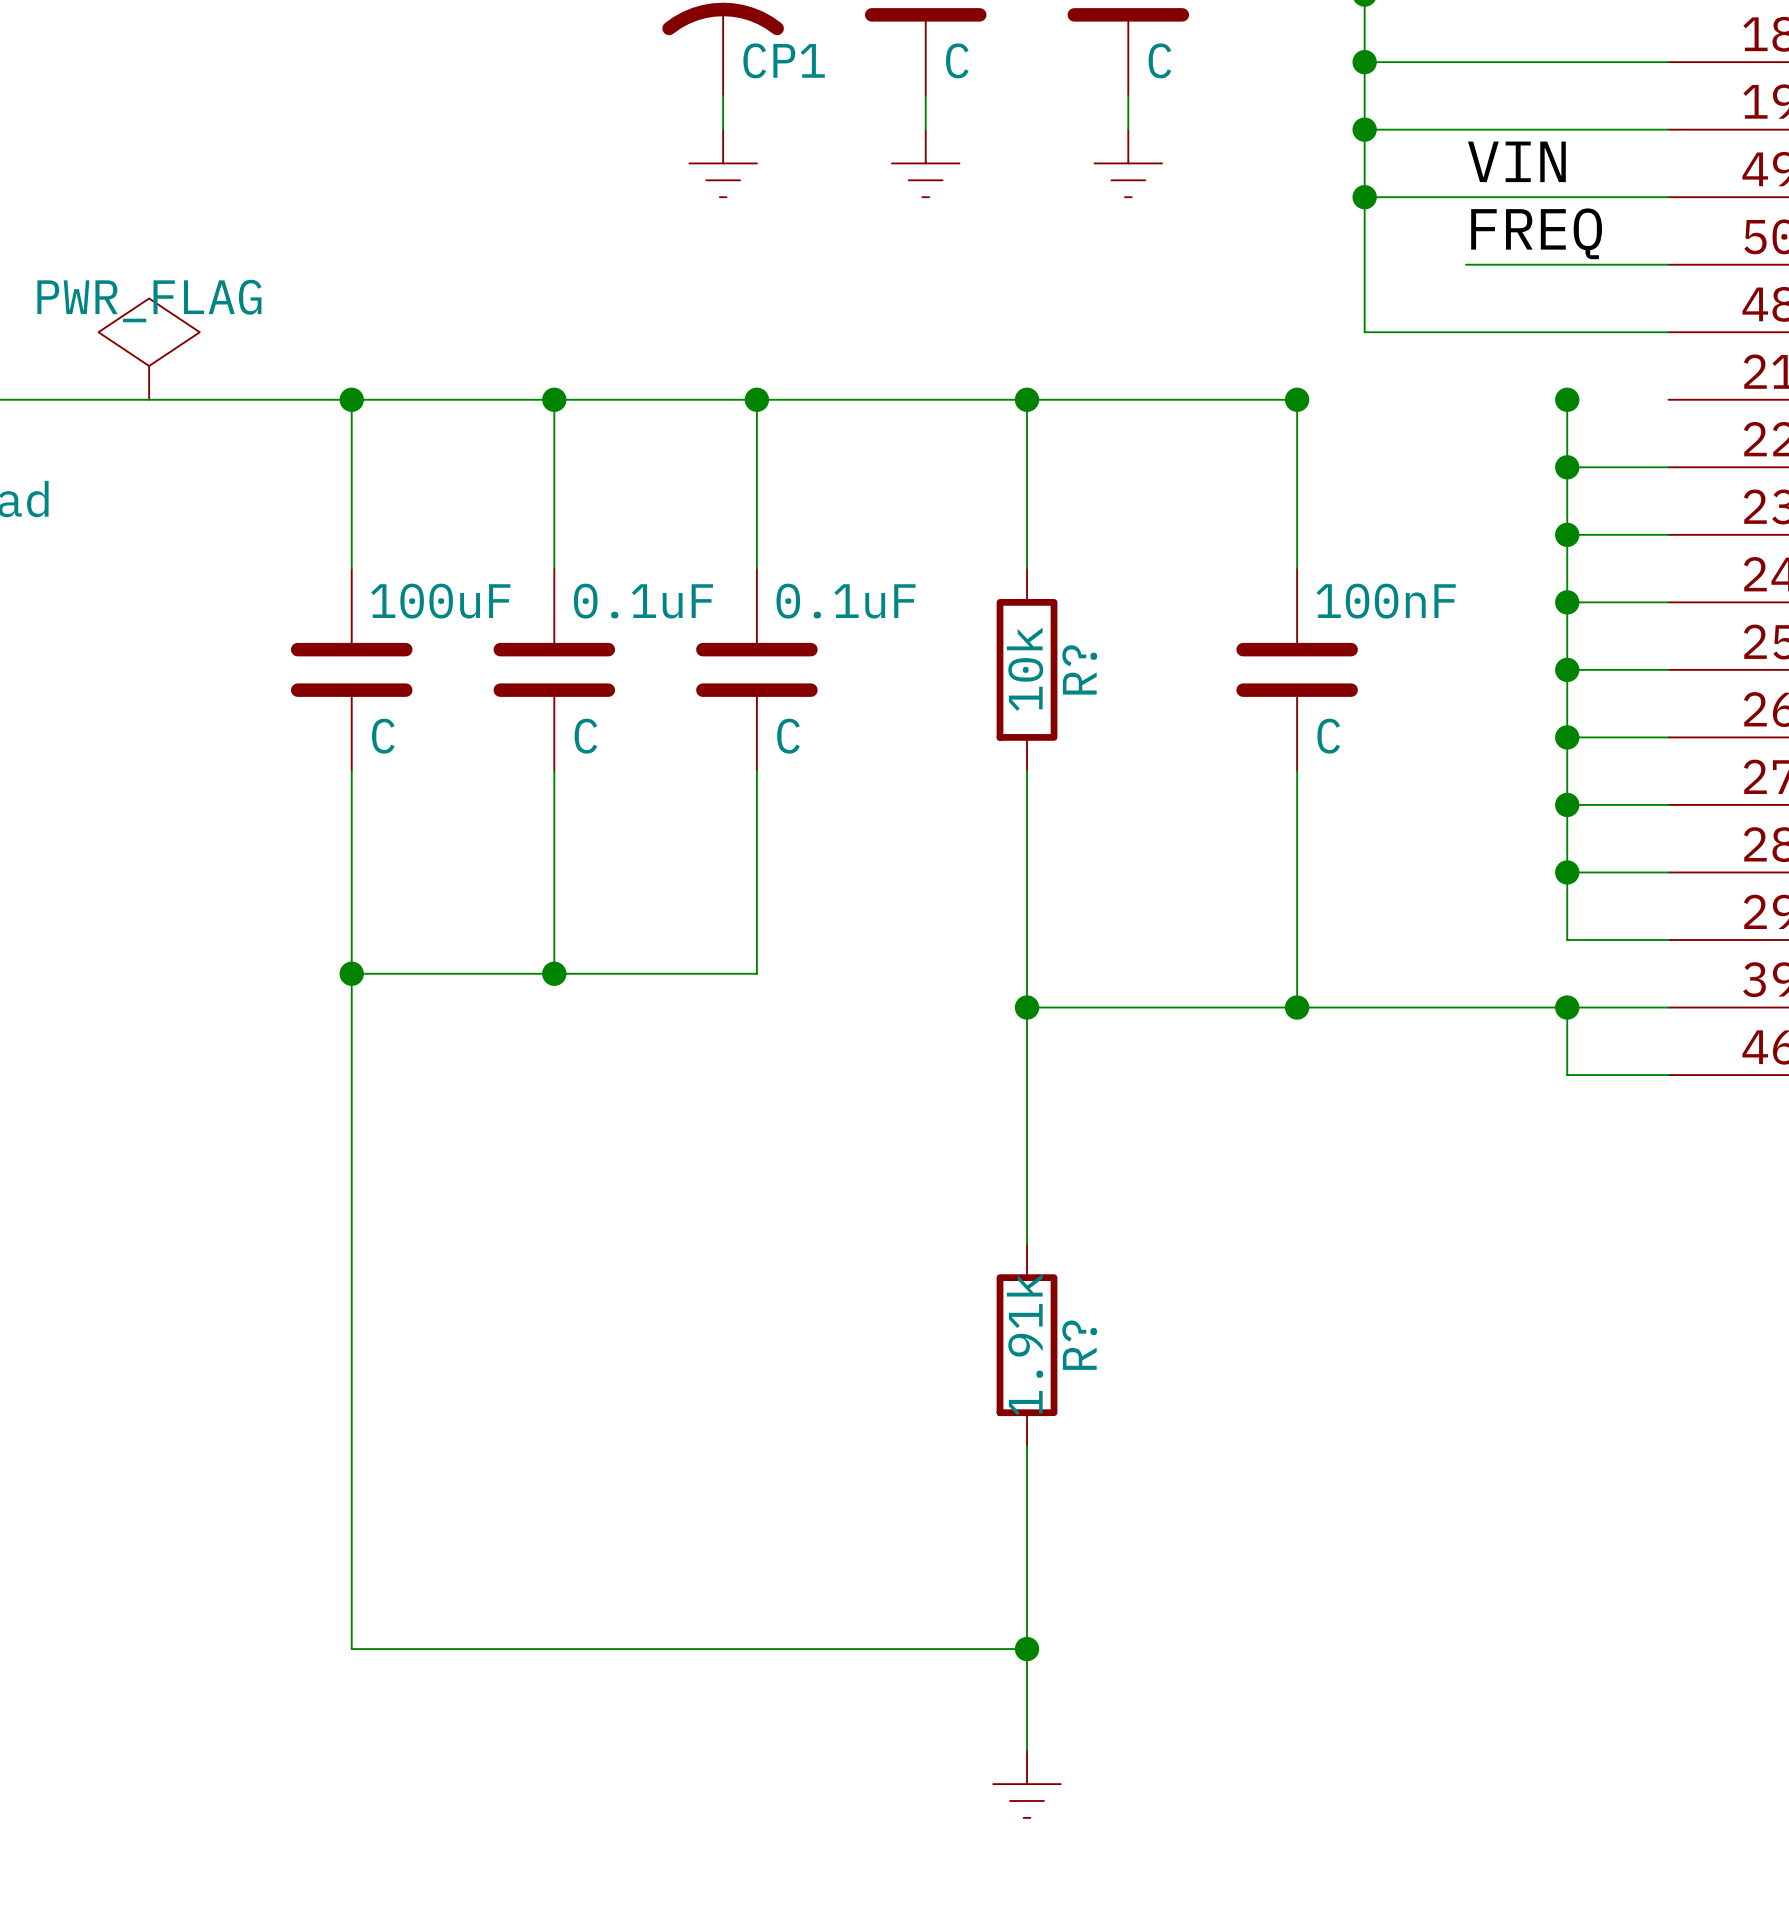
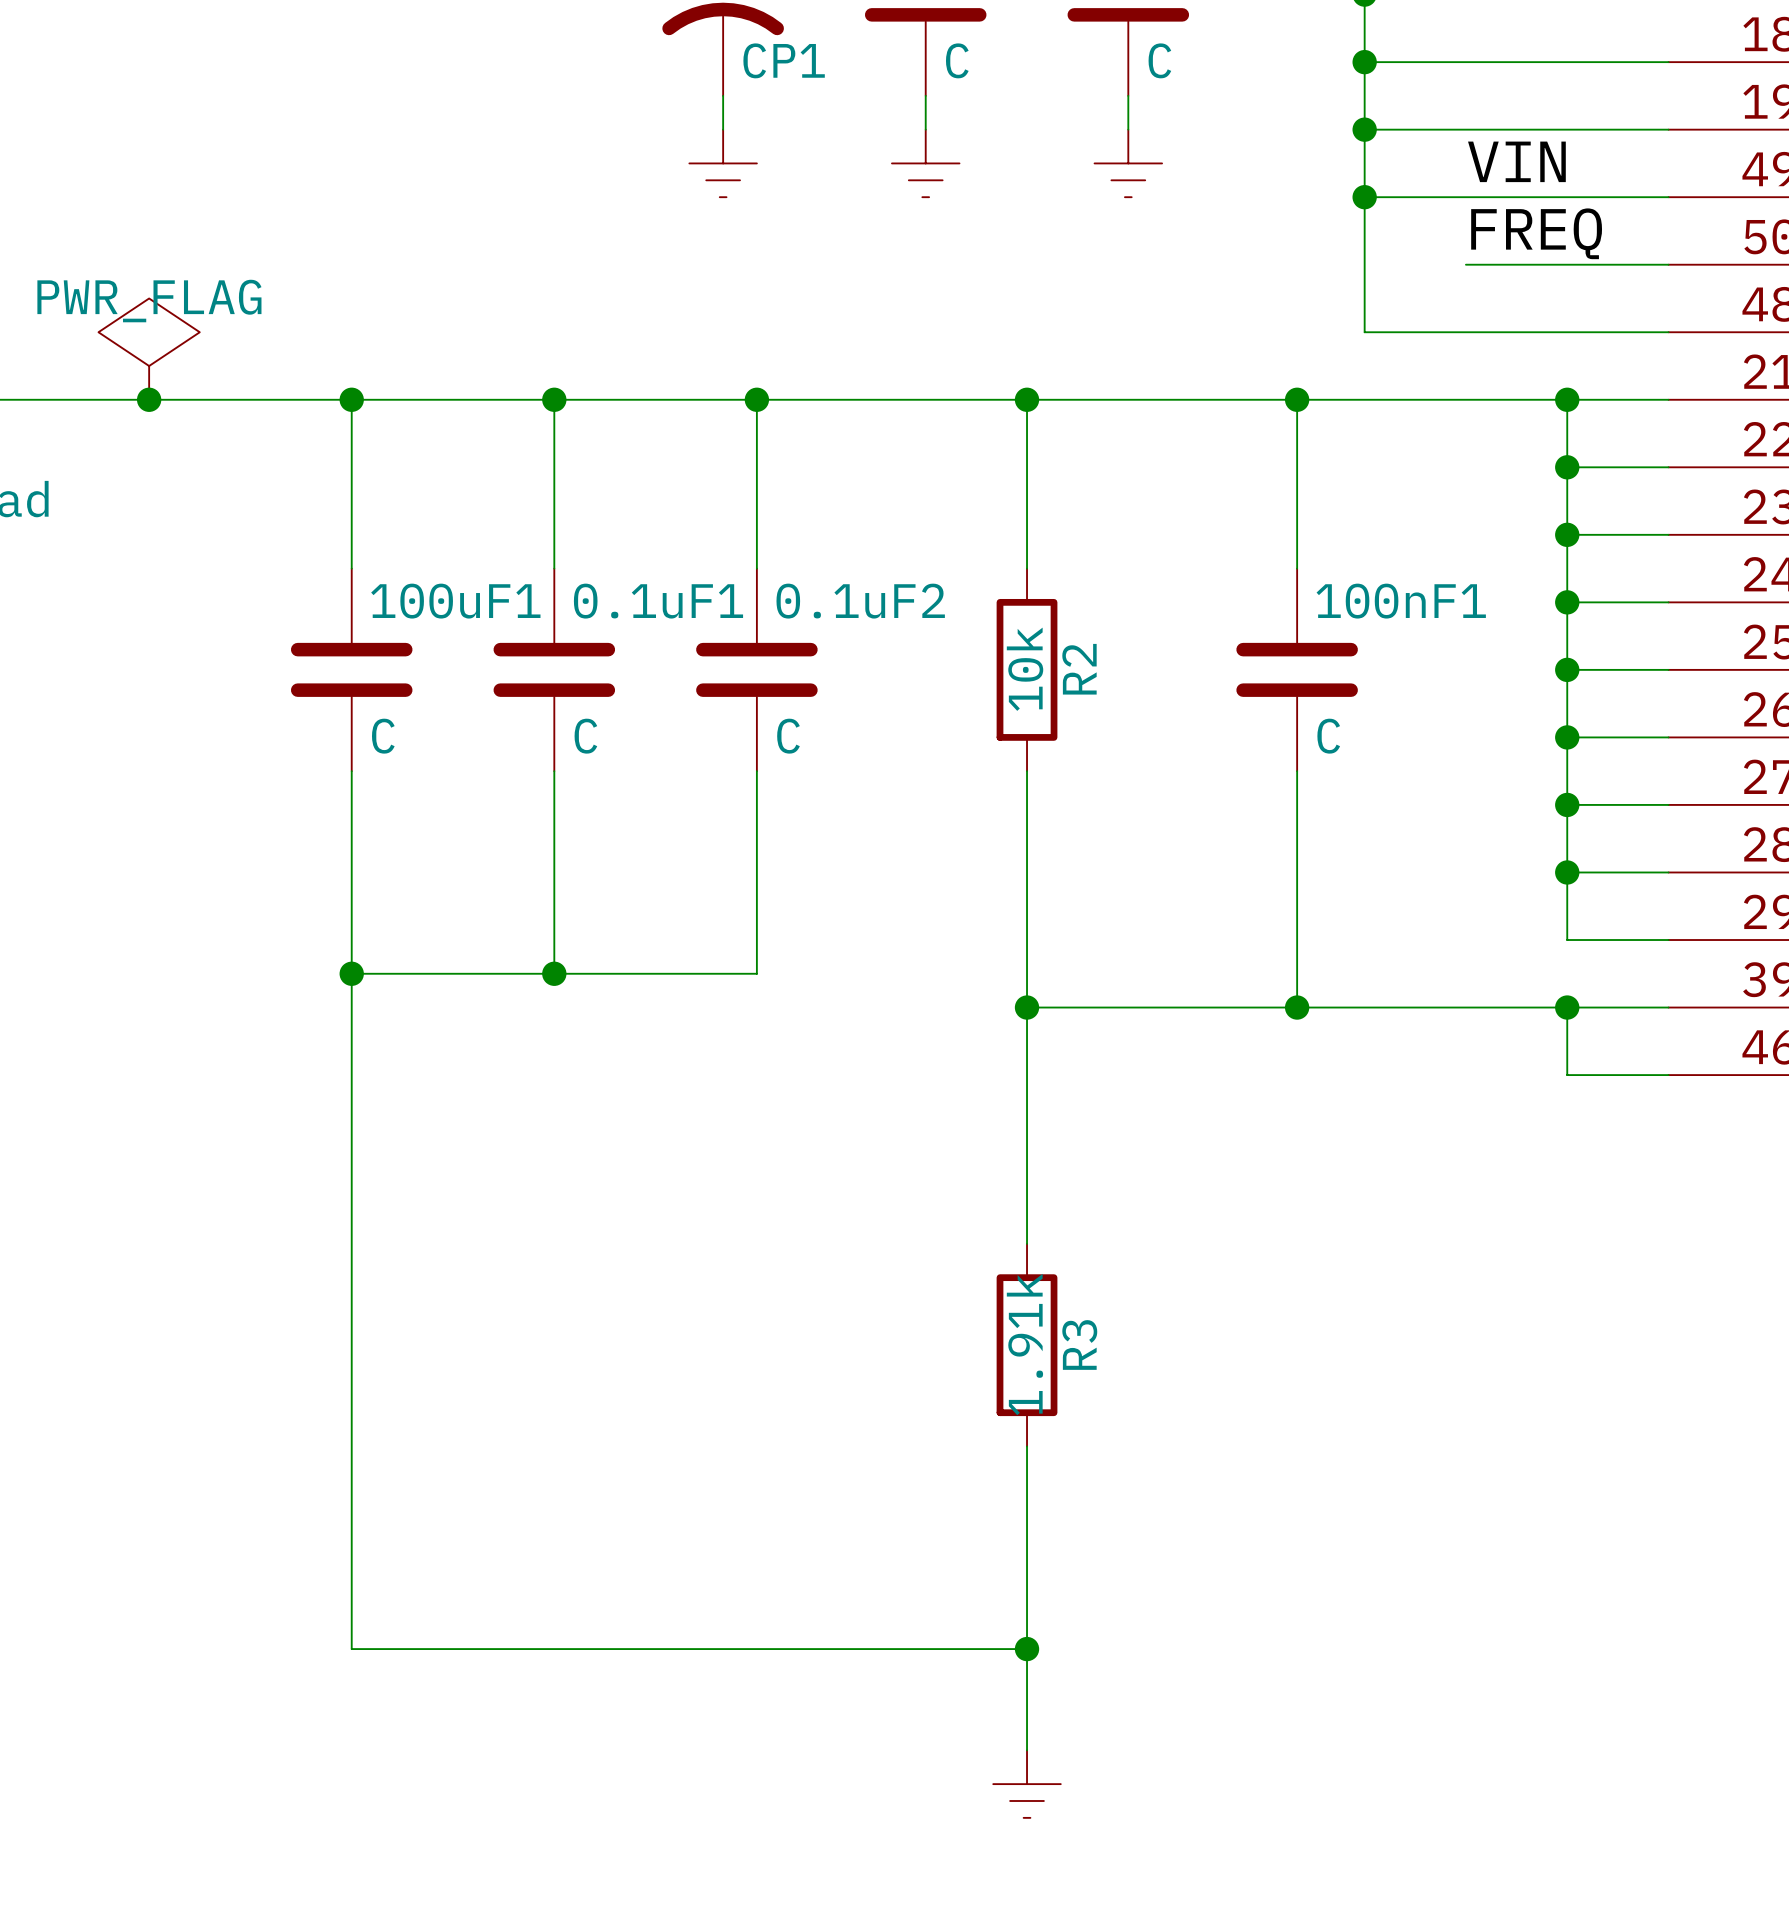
junction: none -> (149, 399)
wire: none -> (1297, 399) (1668, 399)
100uF name: 100uF (440, 601) -> 100uF1 (455, 601)
0.1uF name: 0.1uF (643, 601) -> 0.1uF1 (658, 601)
0.1uF name: 0.1uF (846, 601) -> 0.1uF2 (860, 601)
100nF name: 100nF (1386, 601) -> 100nF1 (1401, 601)
R? name: R? (1079, 669) -> R2 (1079, 669)
R? name: R? (1079, 1345) -> R3 (1079, 1344)

